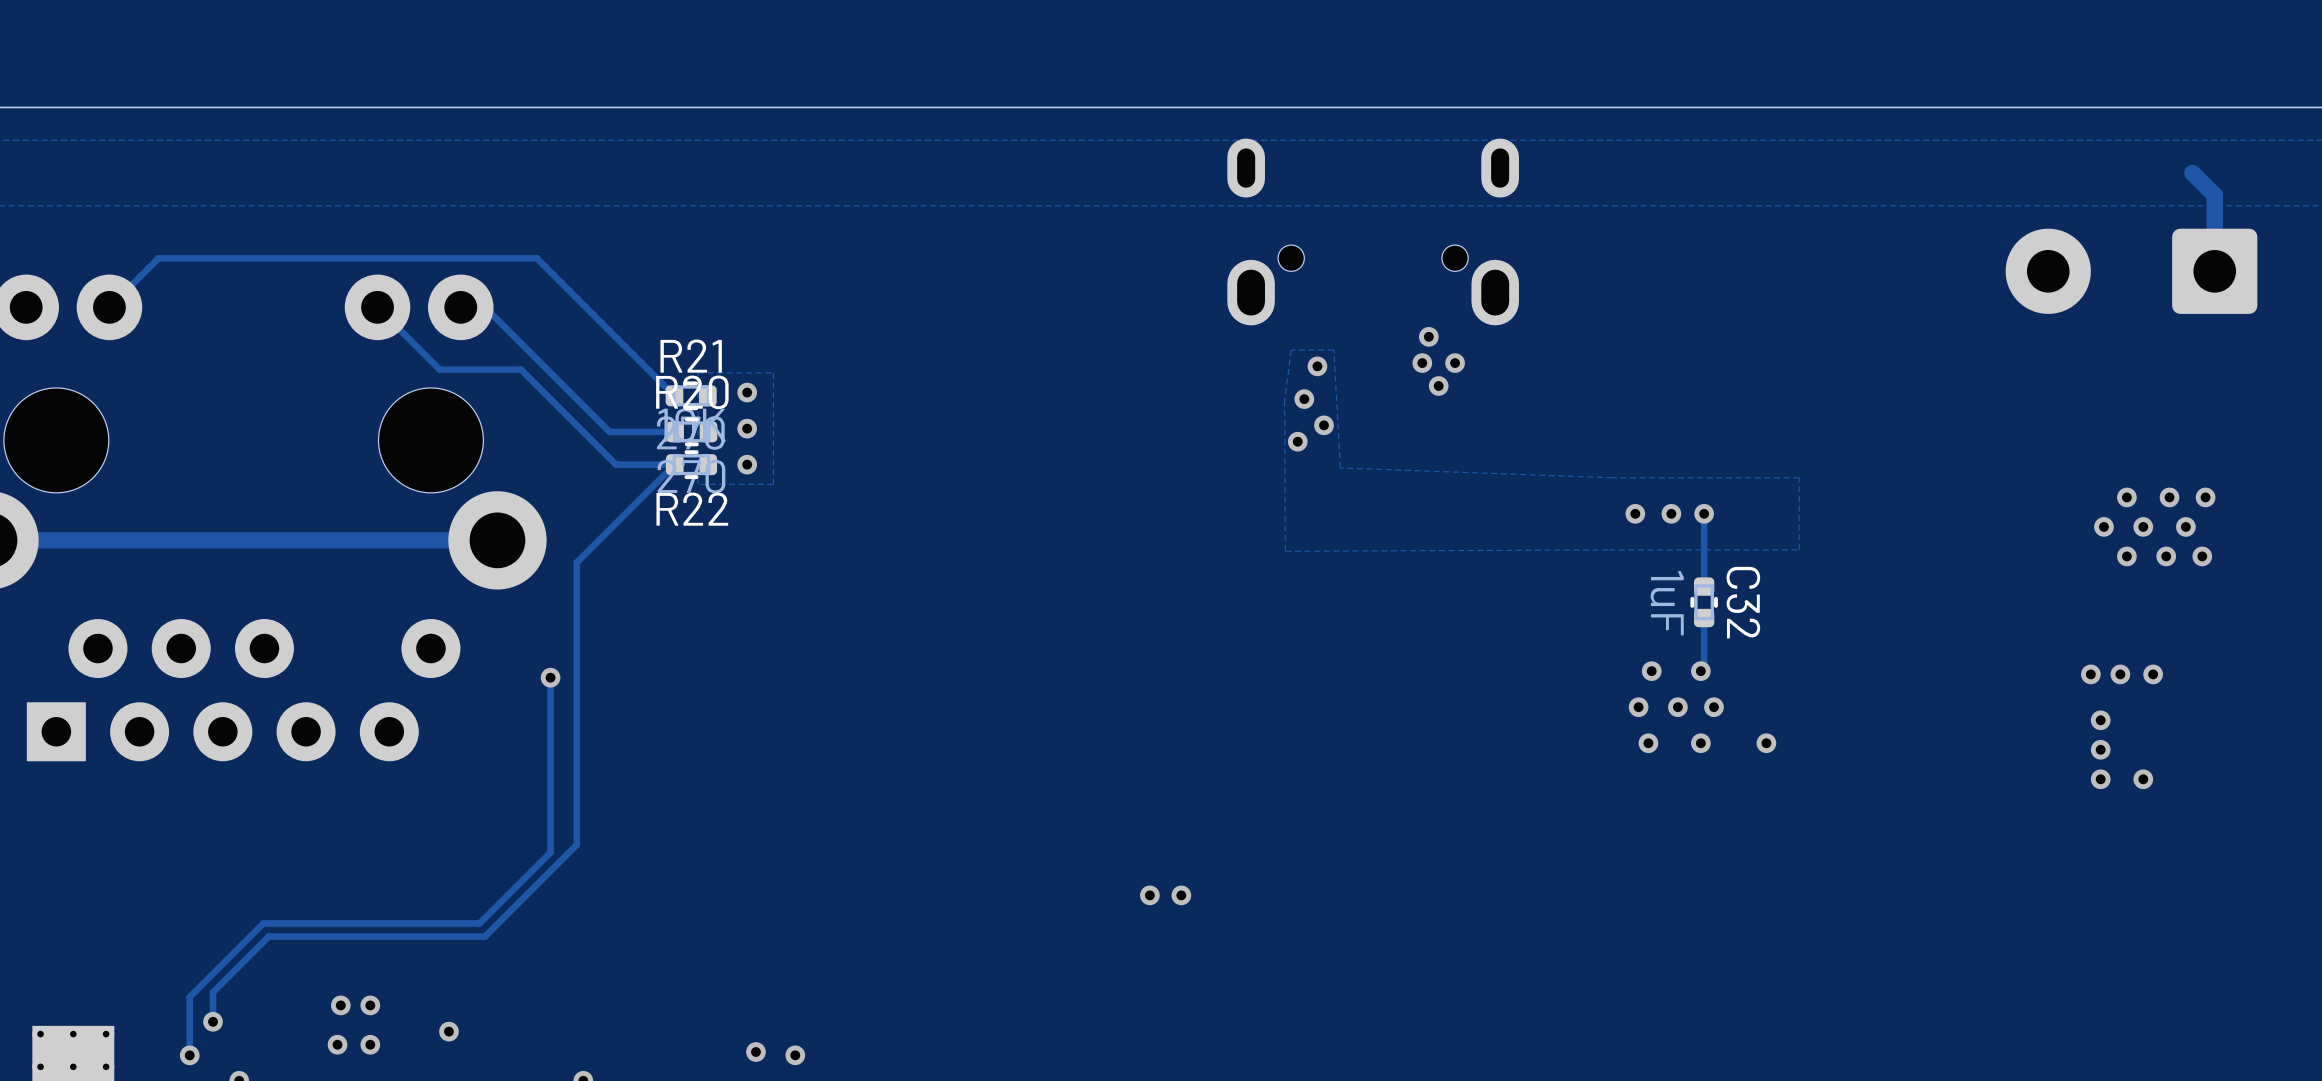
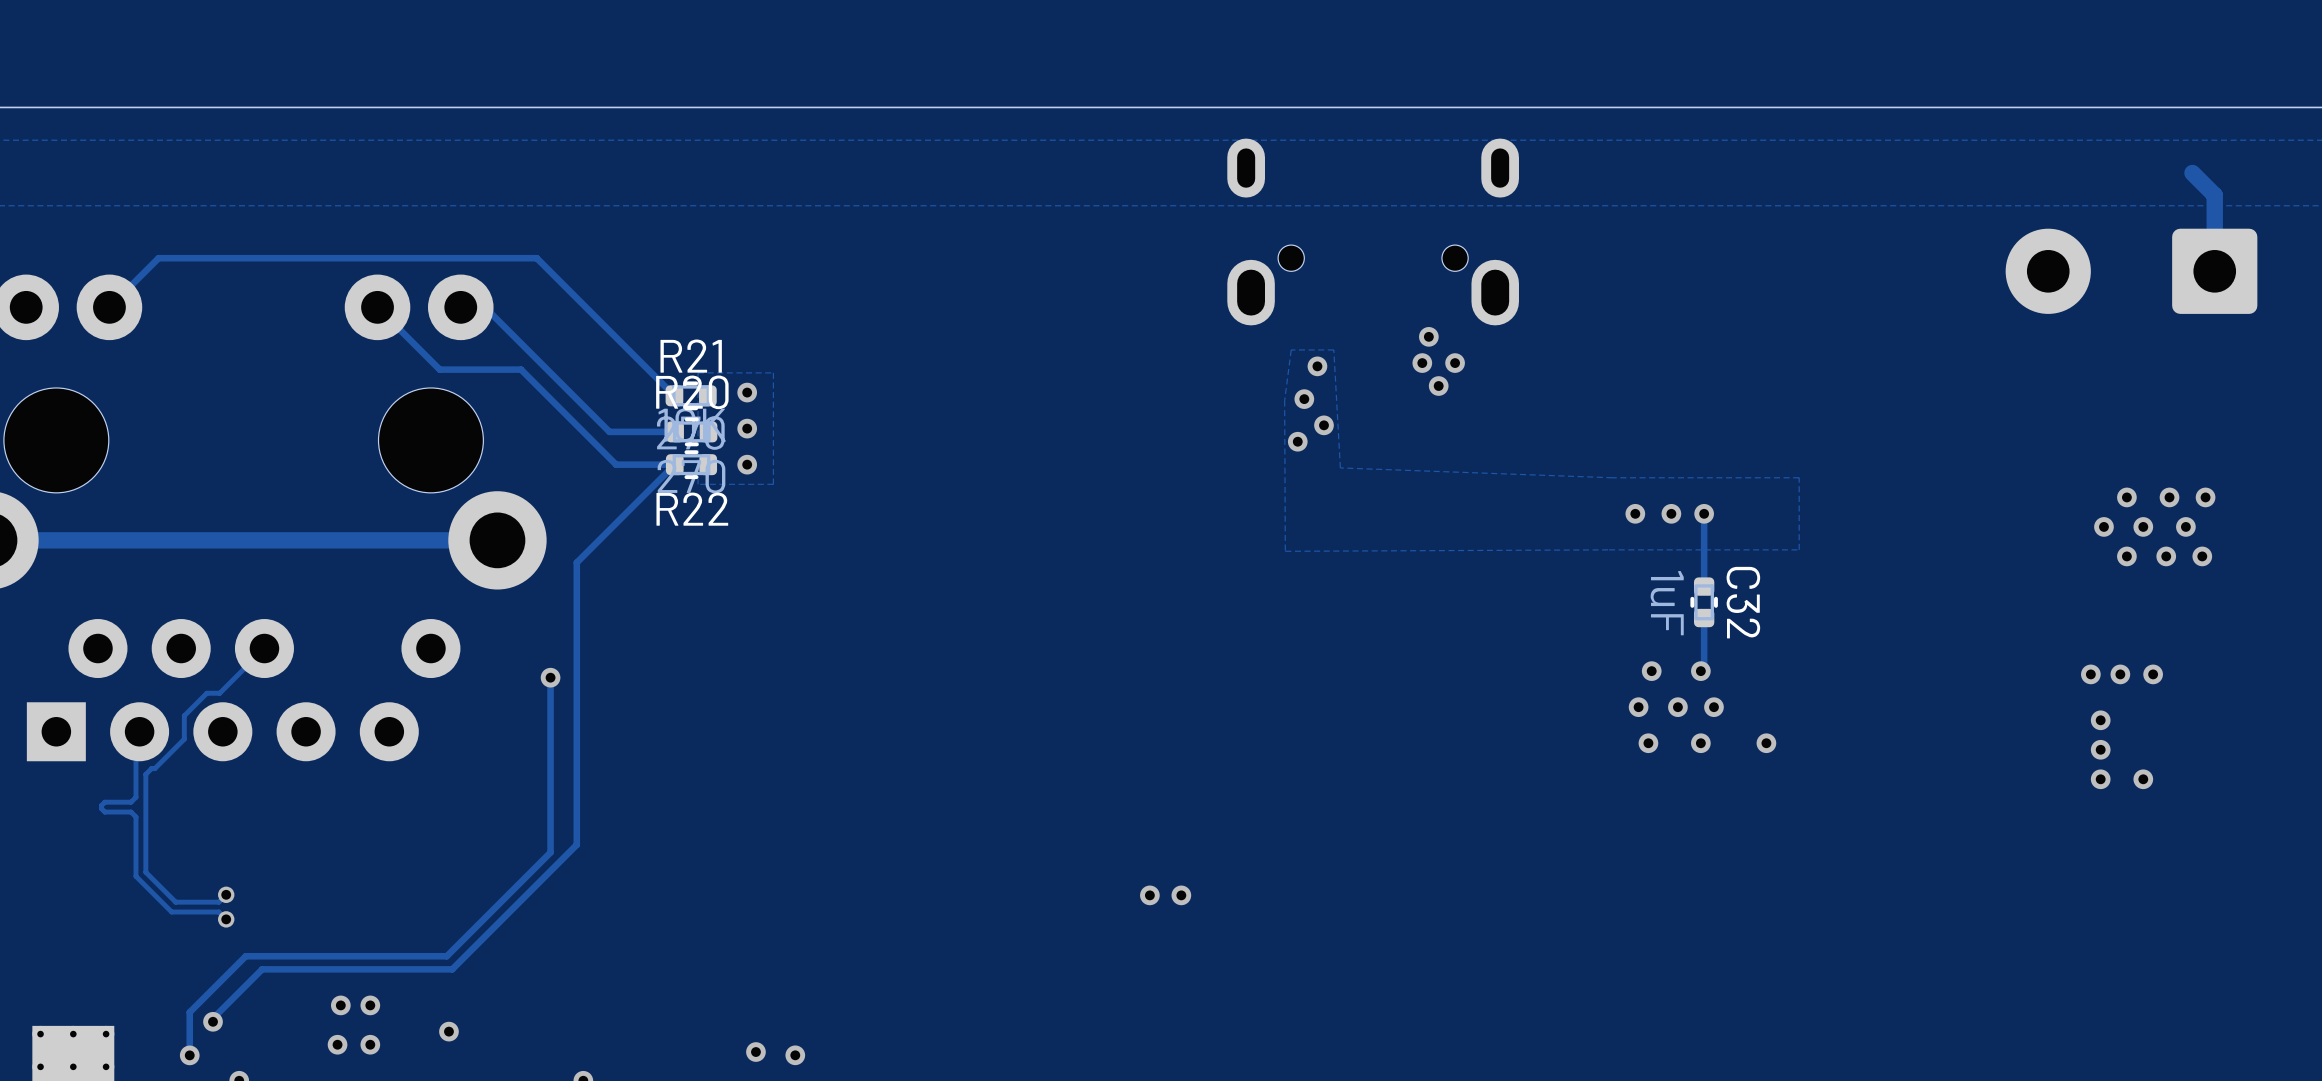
track: none -> (264, 648) (219, 693) (206, 693) (184, 715) (184, 739) (154, 768) (151, 768) (145, 774) (145, 872) (175, 902) (218, 902) (226, 894)
track: none -> (139, 731) (135, 735) (135, 797) (131, 802) (104, 802) (101, 808) (104, 812) (131, 812) (135, 816) (135, 876) (171, 912) (218, 912) (226, 919)
via: none -> (226, 894)
via: none -> (226, 919)
track: (479, 923) (263, 923) (189, 997) (189, 1012) -> (479, 923) (446, 956) (245, 956) (189, 1012)
track: (485, 936) (268, 936) (213, 992) (213, 1018) -> (485, 936) (452, 969) (262, 969) (213, 1018)

